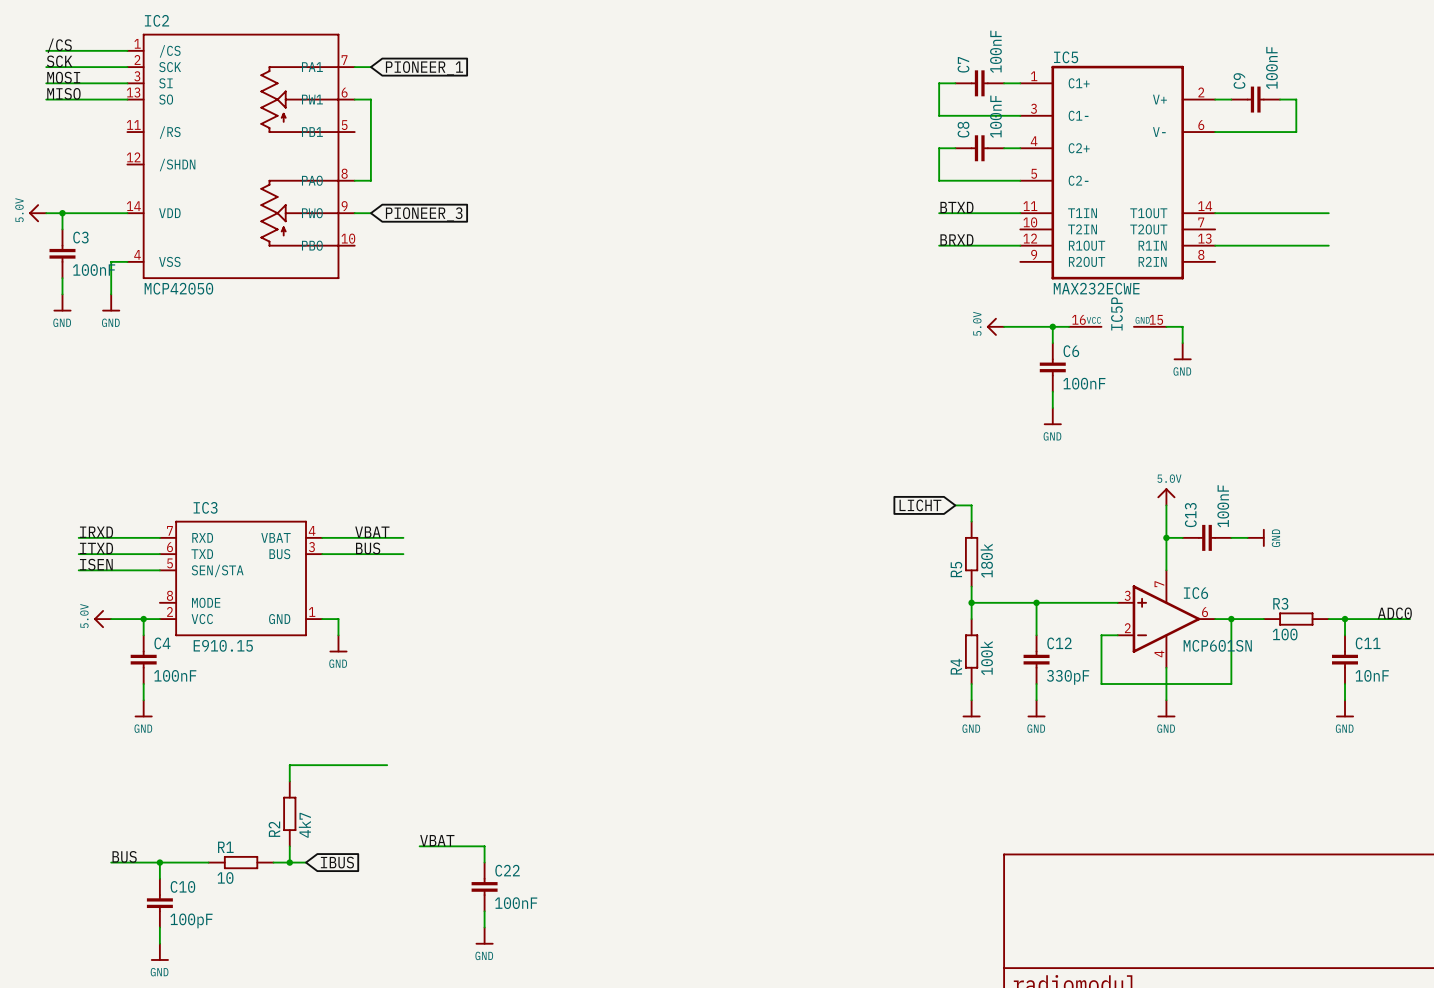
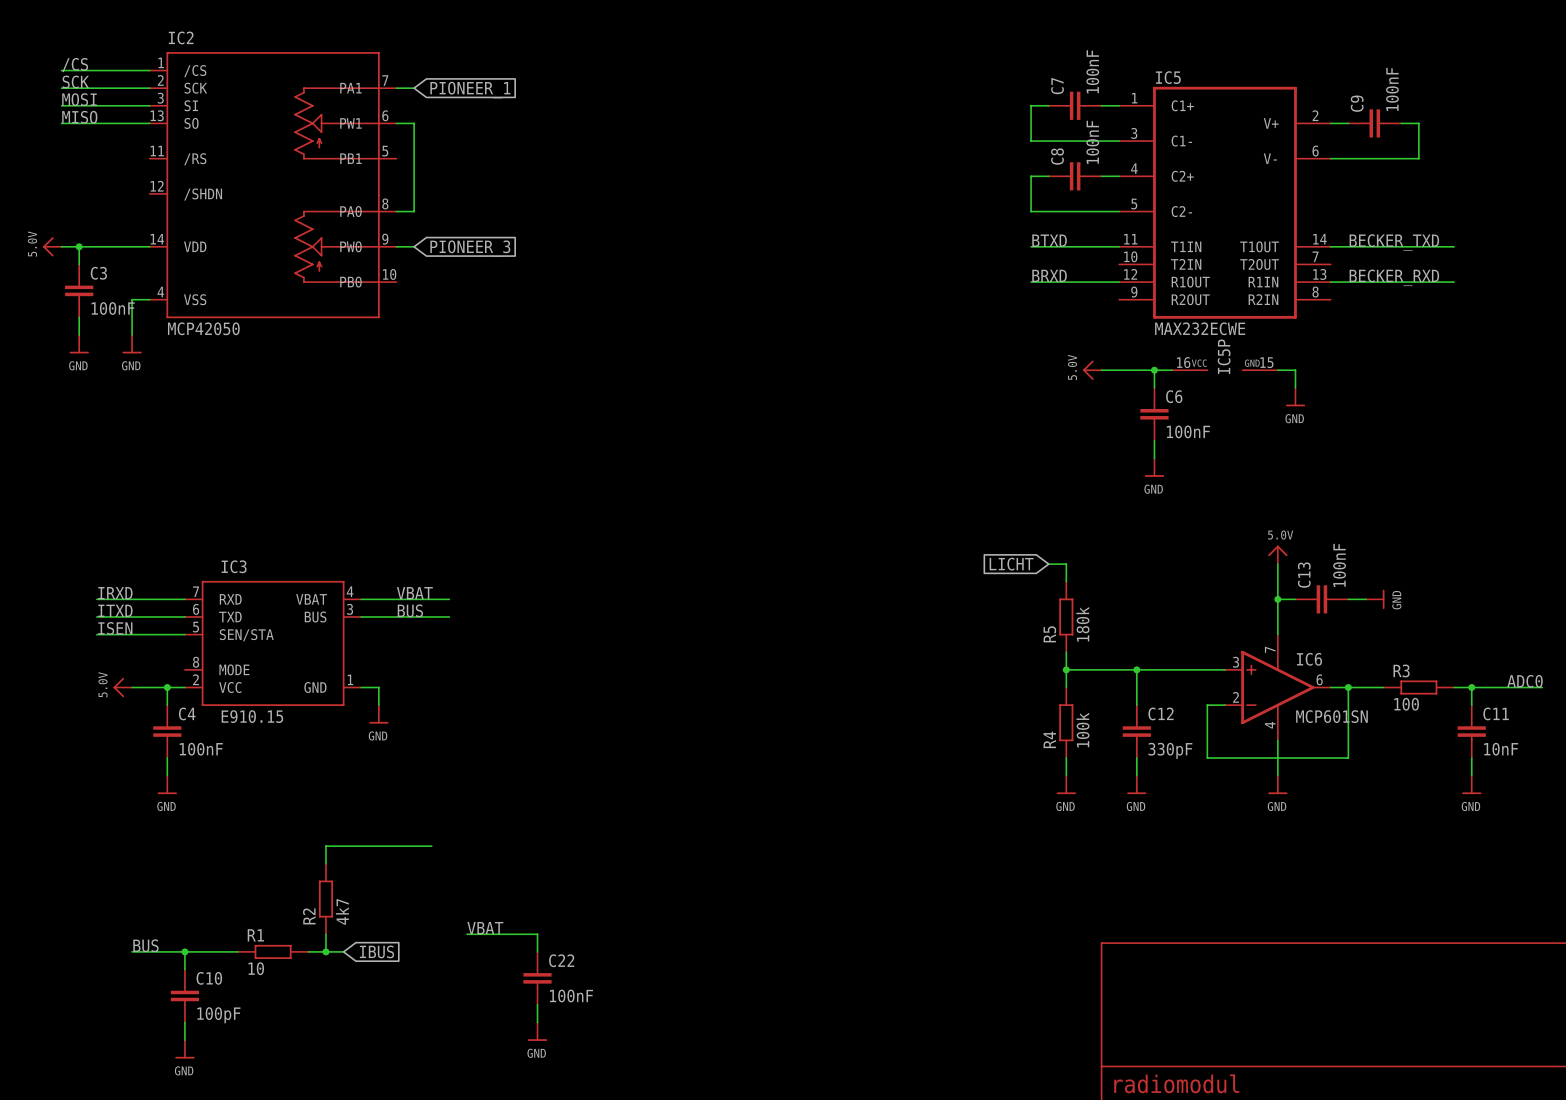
label: none -> BECKER_TXD (1394, 242)
label: none -> BECKER_RXD (1394, 277)

